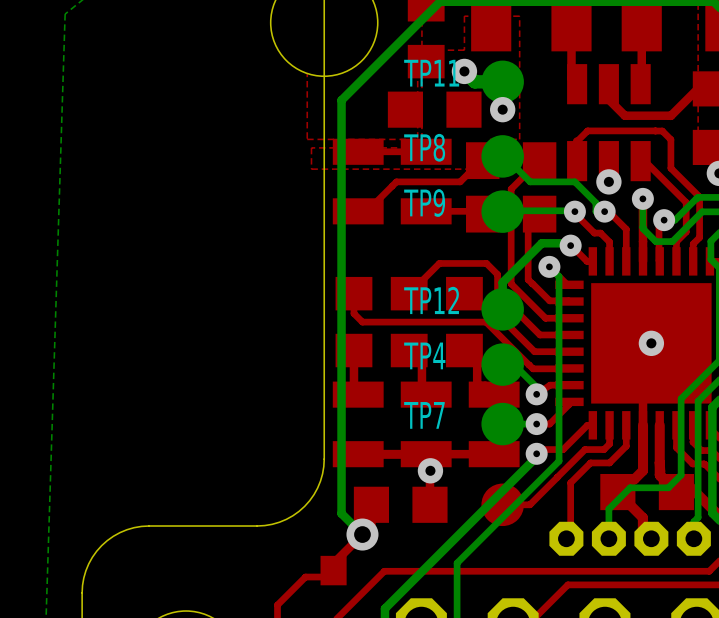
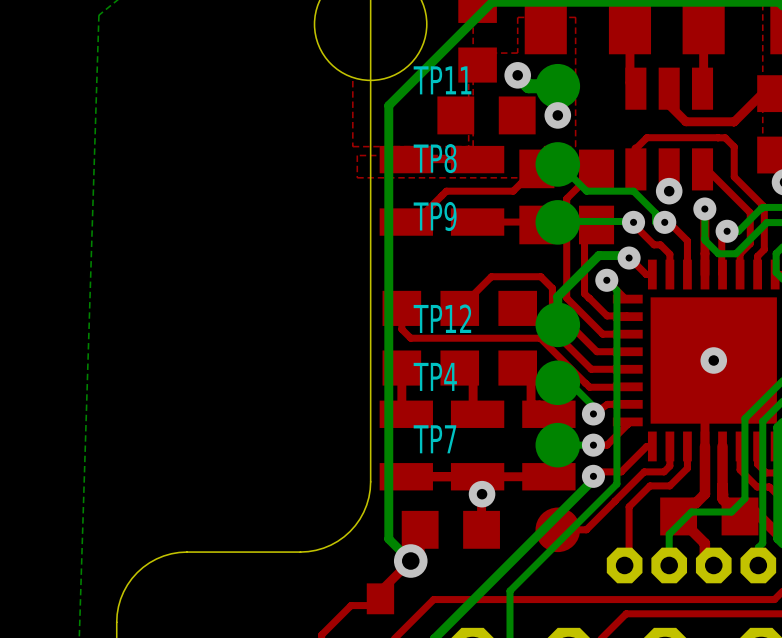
TP11 name position: TP11 (431, 73) -> TP11 (442, 80)
TP8 name position: TP8 (424, 147) -> TP8 (435, 158)
TP9 name position: TP9 (424, 202) -> TP9 (435, 216)
TP12 name position: TP12 (431, 300) -> TP12 (442, 318)
TP4 name position: TP4 (424, 355) -> TP4 (435, 376)
TP7 name position: TP7 (424, 415) -> TP7 (434, 439)

